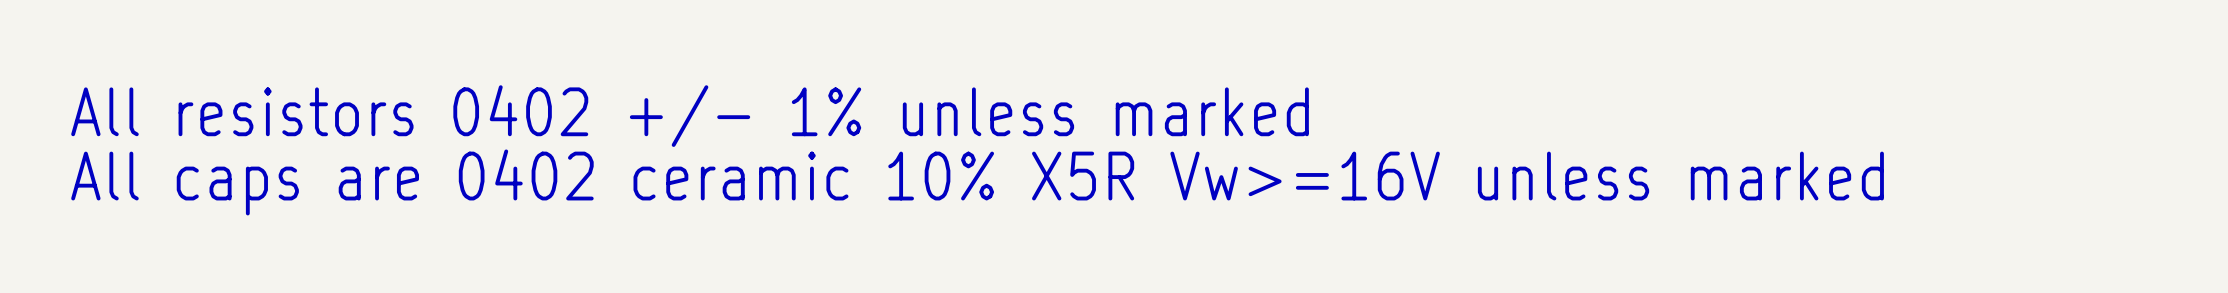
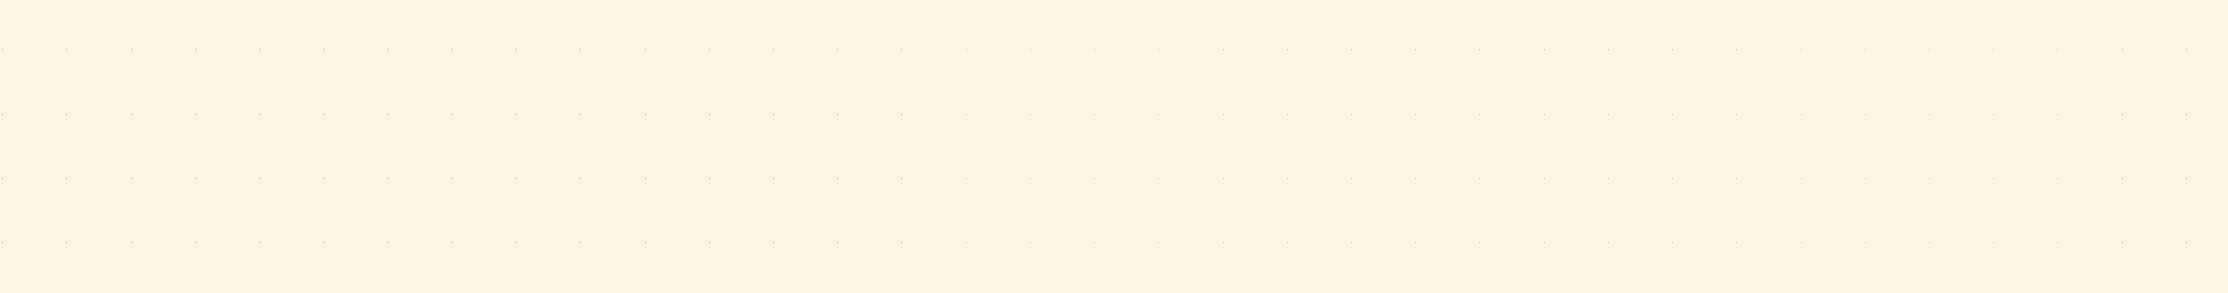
text: All resistors 0402 +/- 1% unless marked (690, 116) -> none
text: All caps are 0402 ceramic 10% X5R Vw>=16V unless marked (977, 182) -> none

